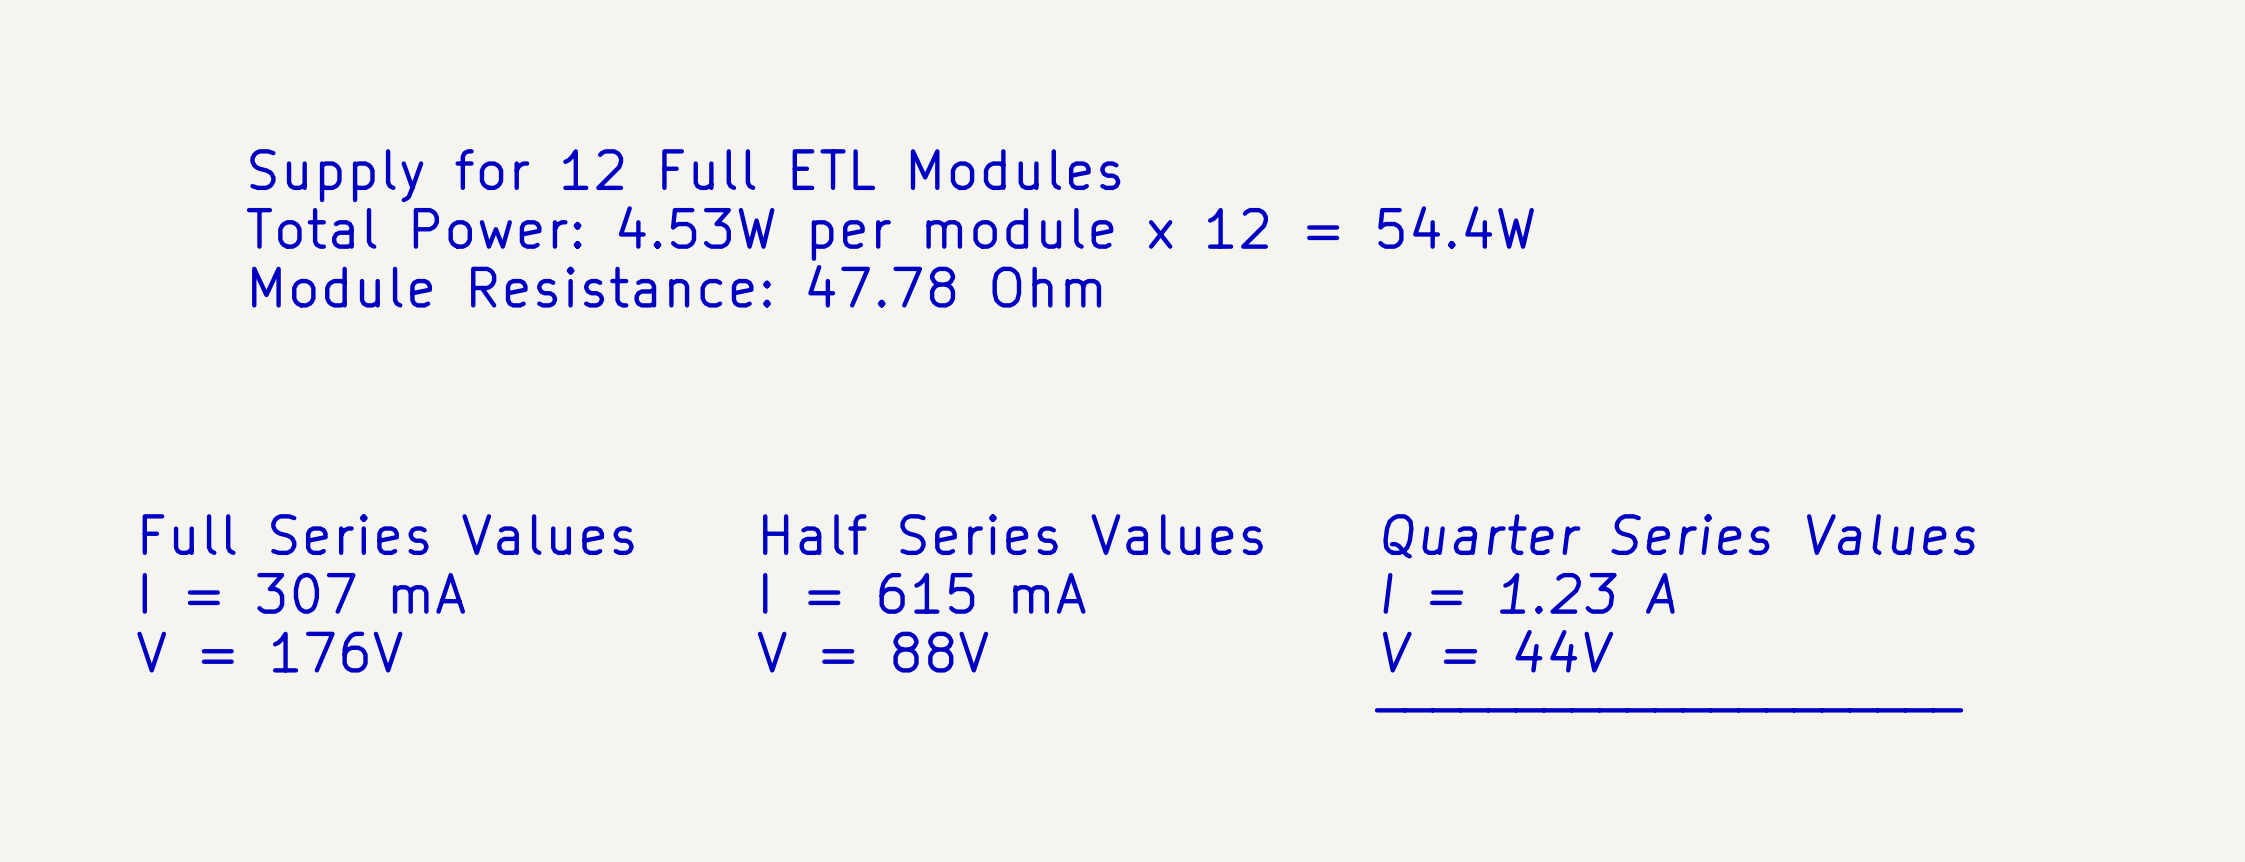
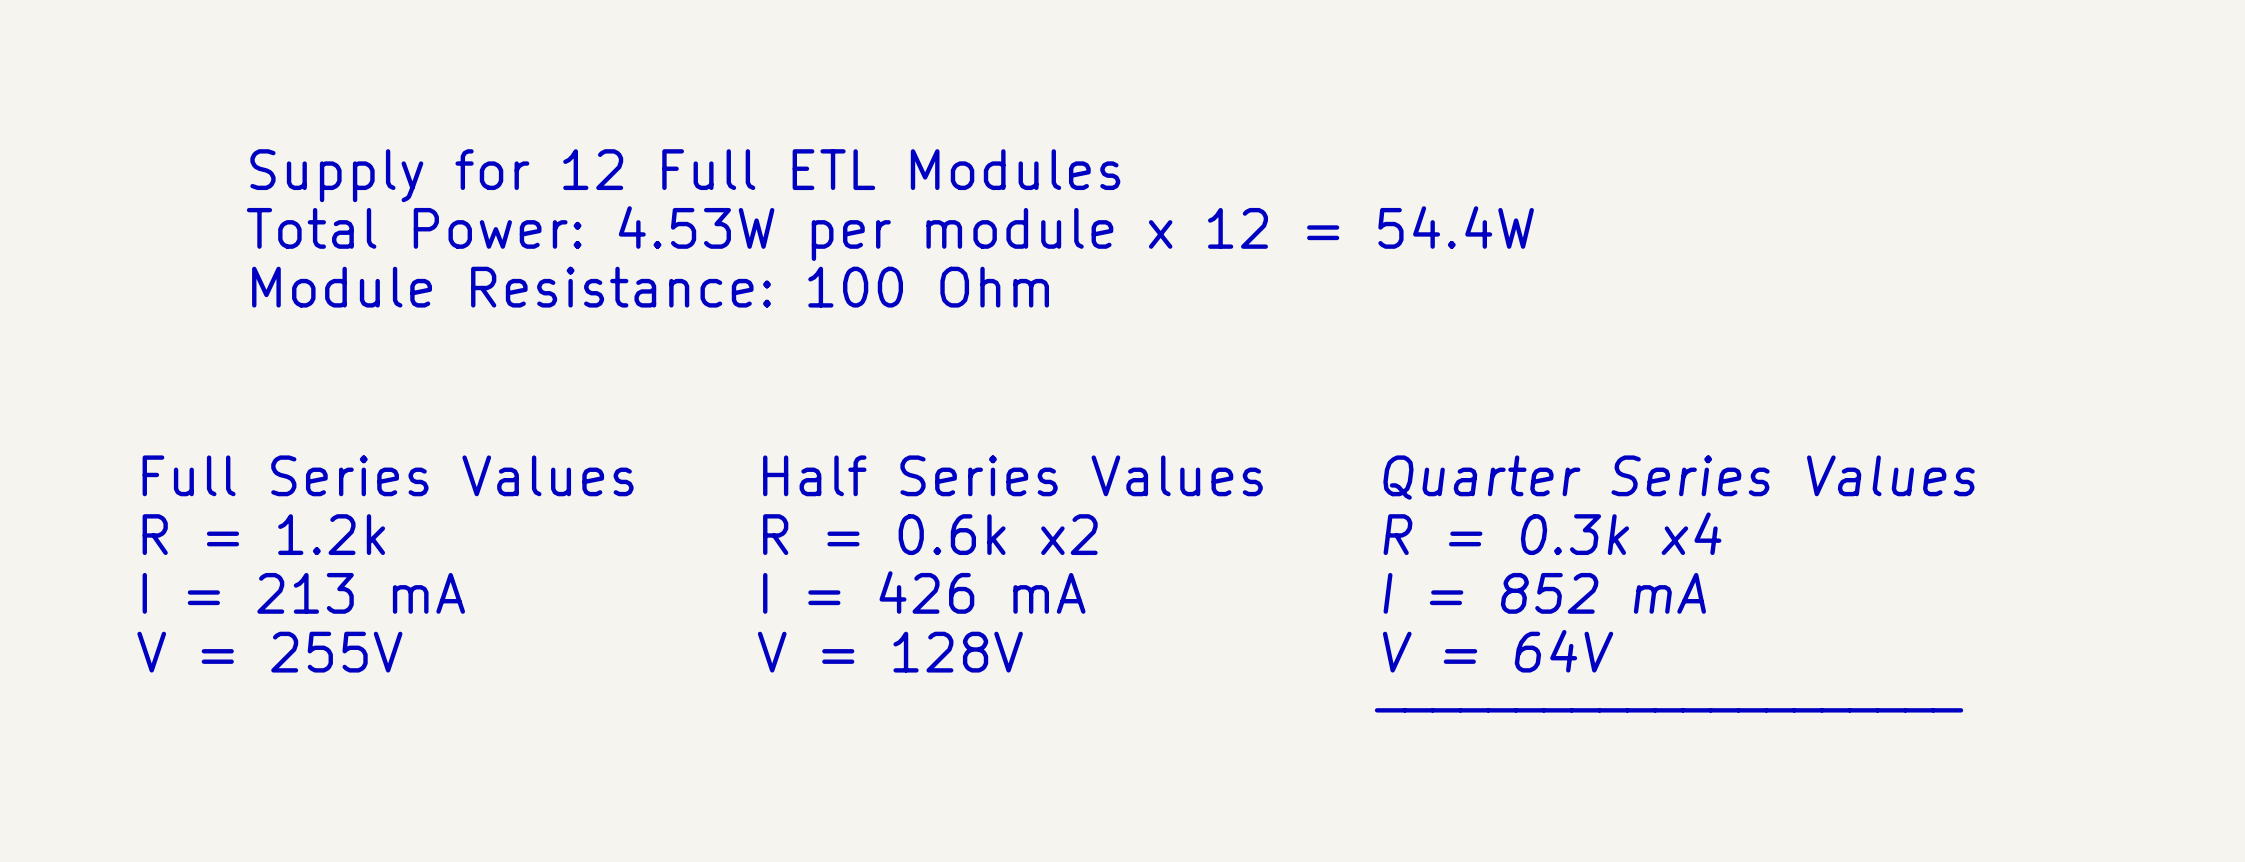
text: Module Resistance: 47.78 Ohm (676, 286) -> Module Resistance: 100 Ohm (650, 287)
text: none -> Full Series Values (388, 475)
text: none -> Half Series Values (1012, 475)
text: none -> Quarter Series Values (1679, 477)
text: Full Series Values (388, 534) -> R = 1.2k (263, 534)
text: Half Series Values (1012, 534) -> R = 0.6k x2 (930, 534)
text: Quarter Series Values (1679, 536) -> R = 0.3k x4 (1552, 533)
text: I = 307 mA (303, 593) -> I = 213 mA (303, 593)
text: I = 615 mA (924, 593) -> I = 426 mA (924, 592)
text: I = 1.23 A (1529, 593) -> I = 852 mA (1544, 593)
text: V = 44V (1498, 651) -> V = 64V (1498, 651)
text: V = 176V (269, 652) -> V = 255V (269, 652)
text: V = 88V (873, 652) -> V = 128V (890, 652)

